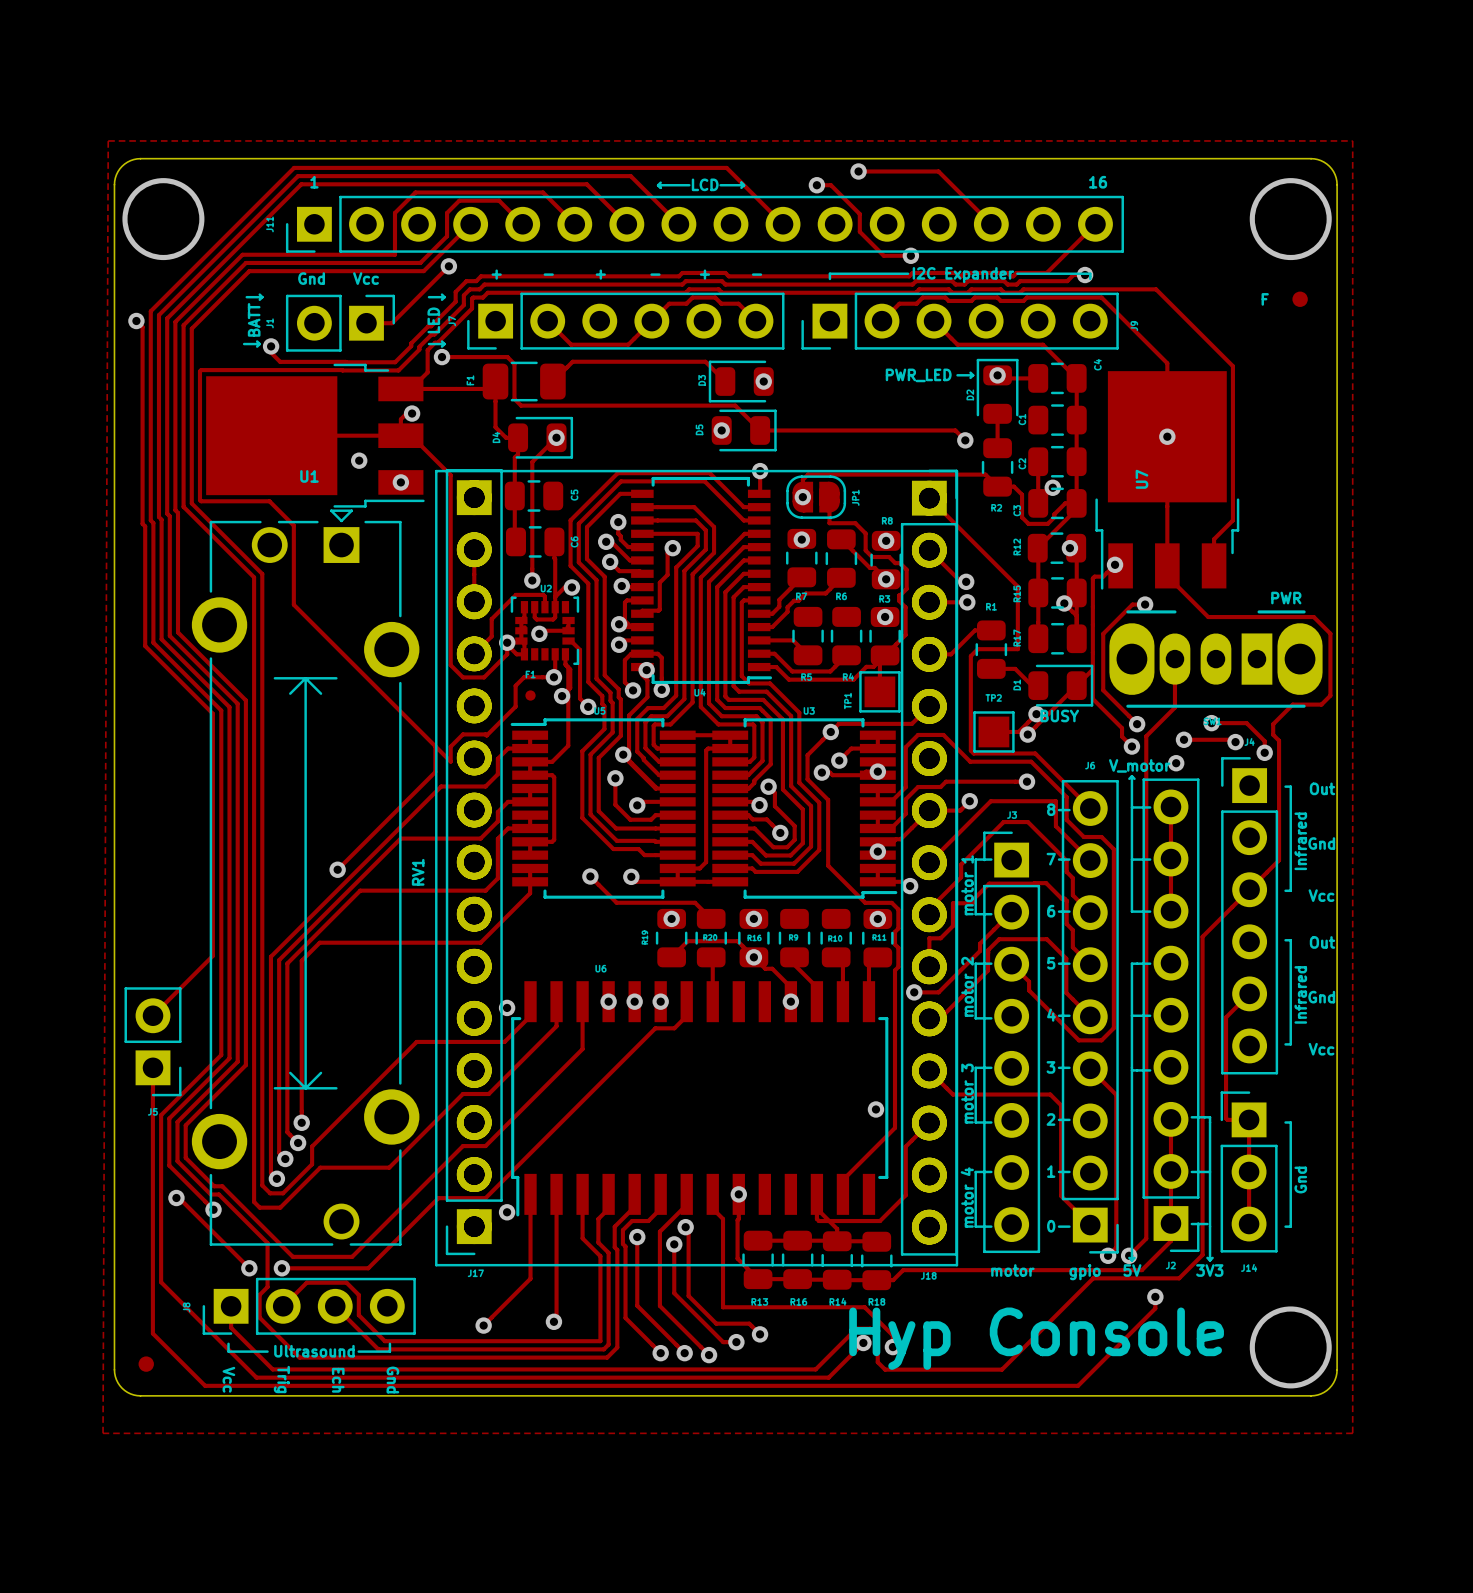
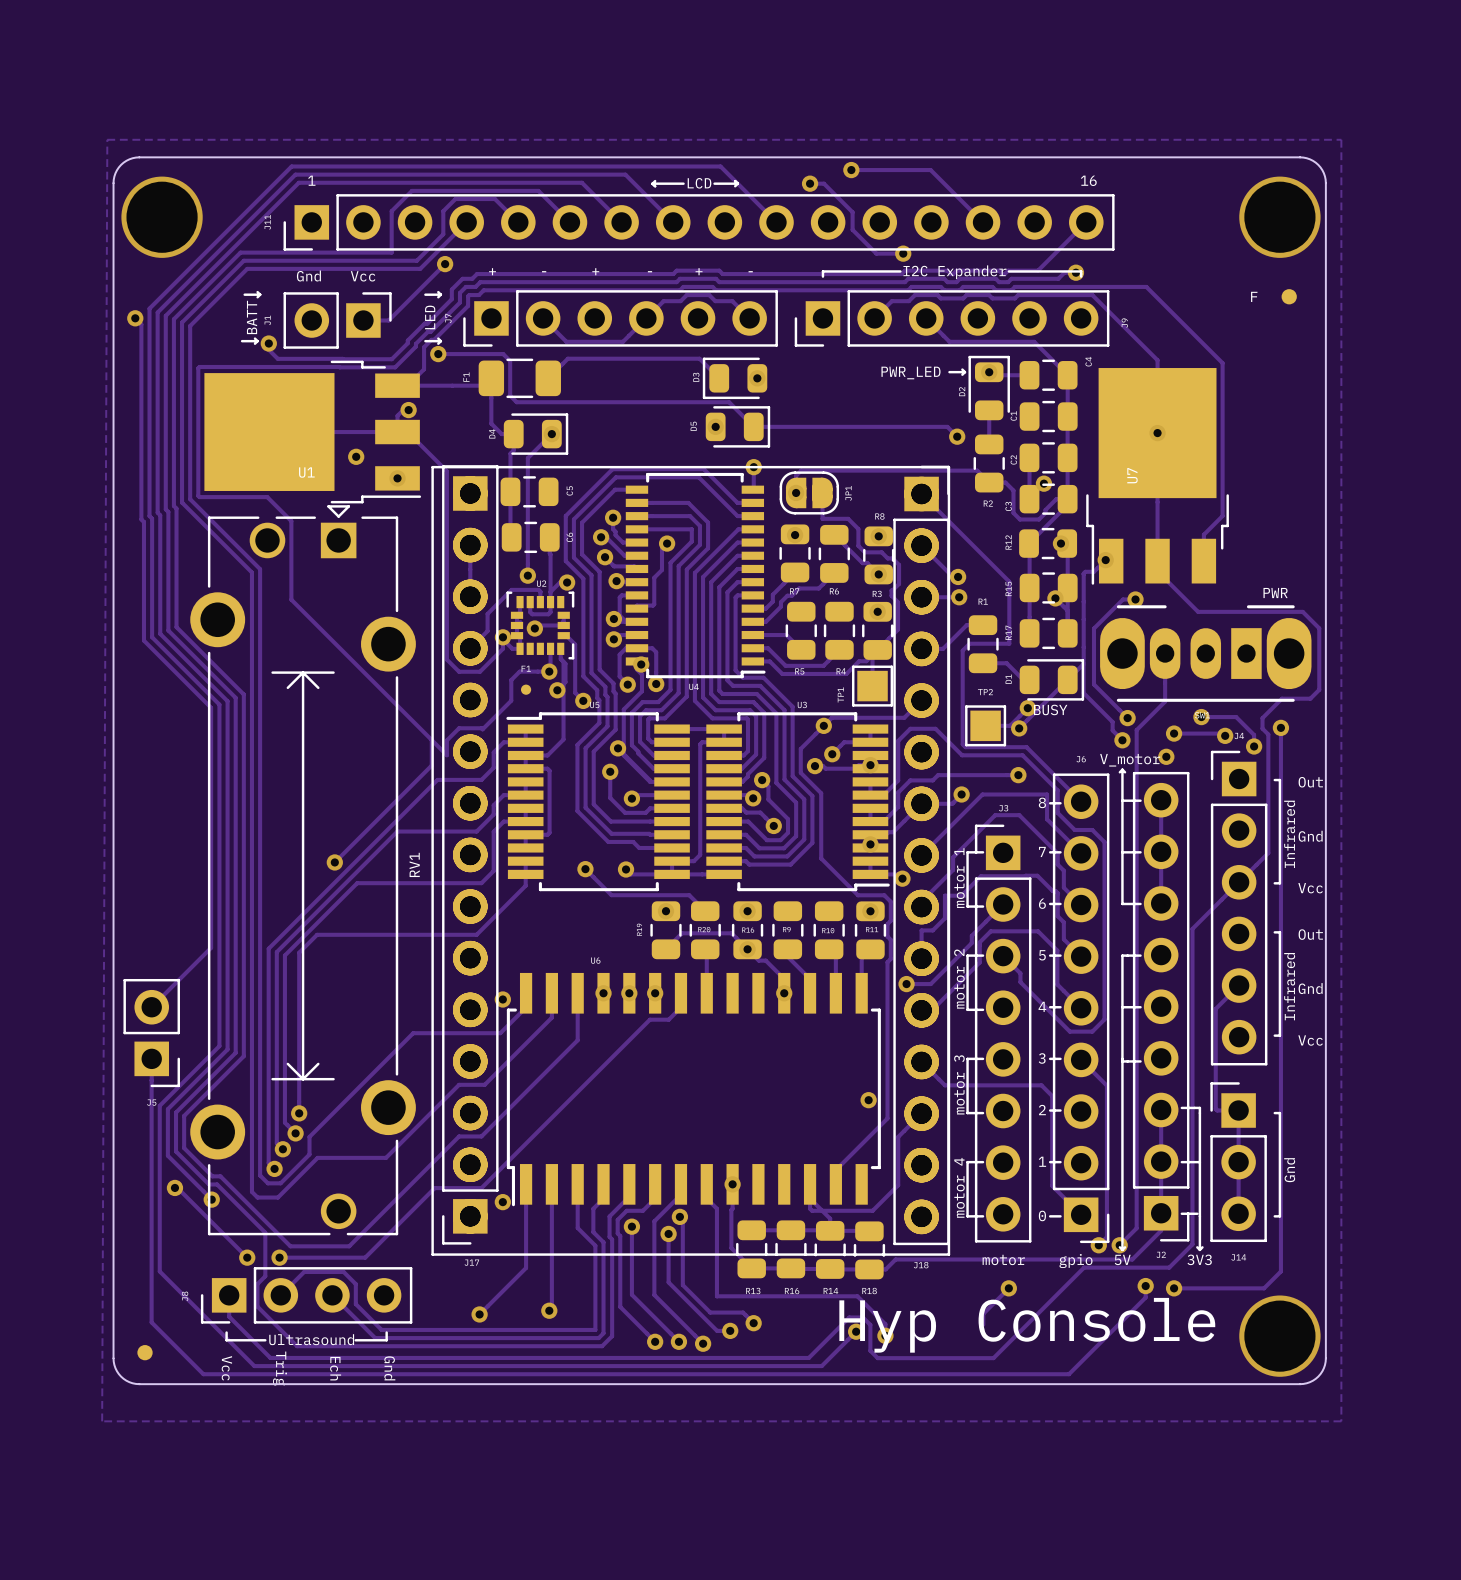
track: none -> (1280, 727) (1280, 1271) (1264, 1288) (1174, 1288)
via: none -> (1280, 727)
track: none -> (1008, 1288) (983, 1313) (983, 1324)
via: none -> (1008, 1288)
via: none -> (1174, 1288)

